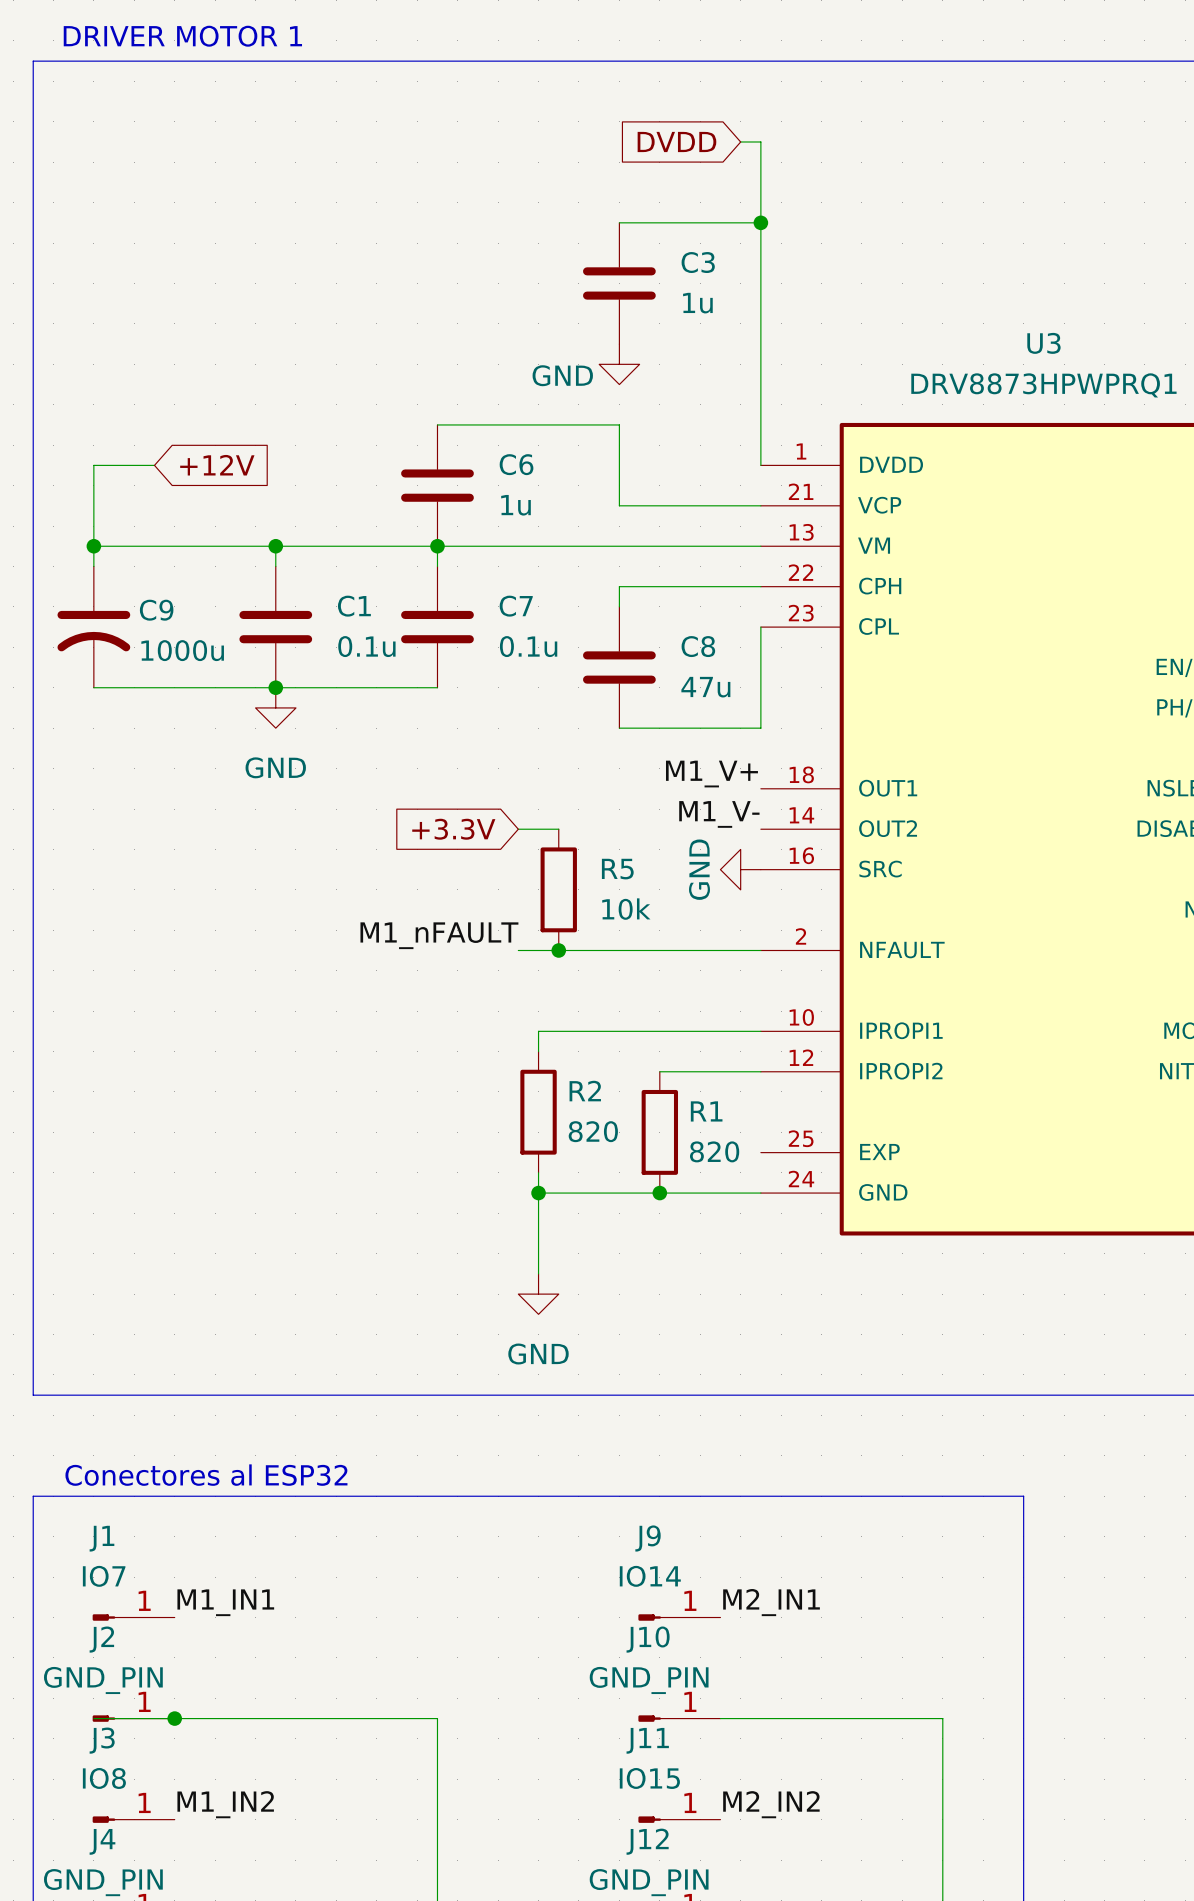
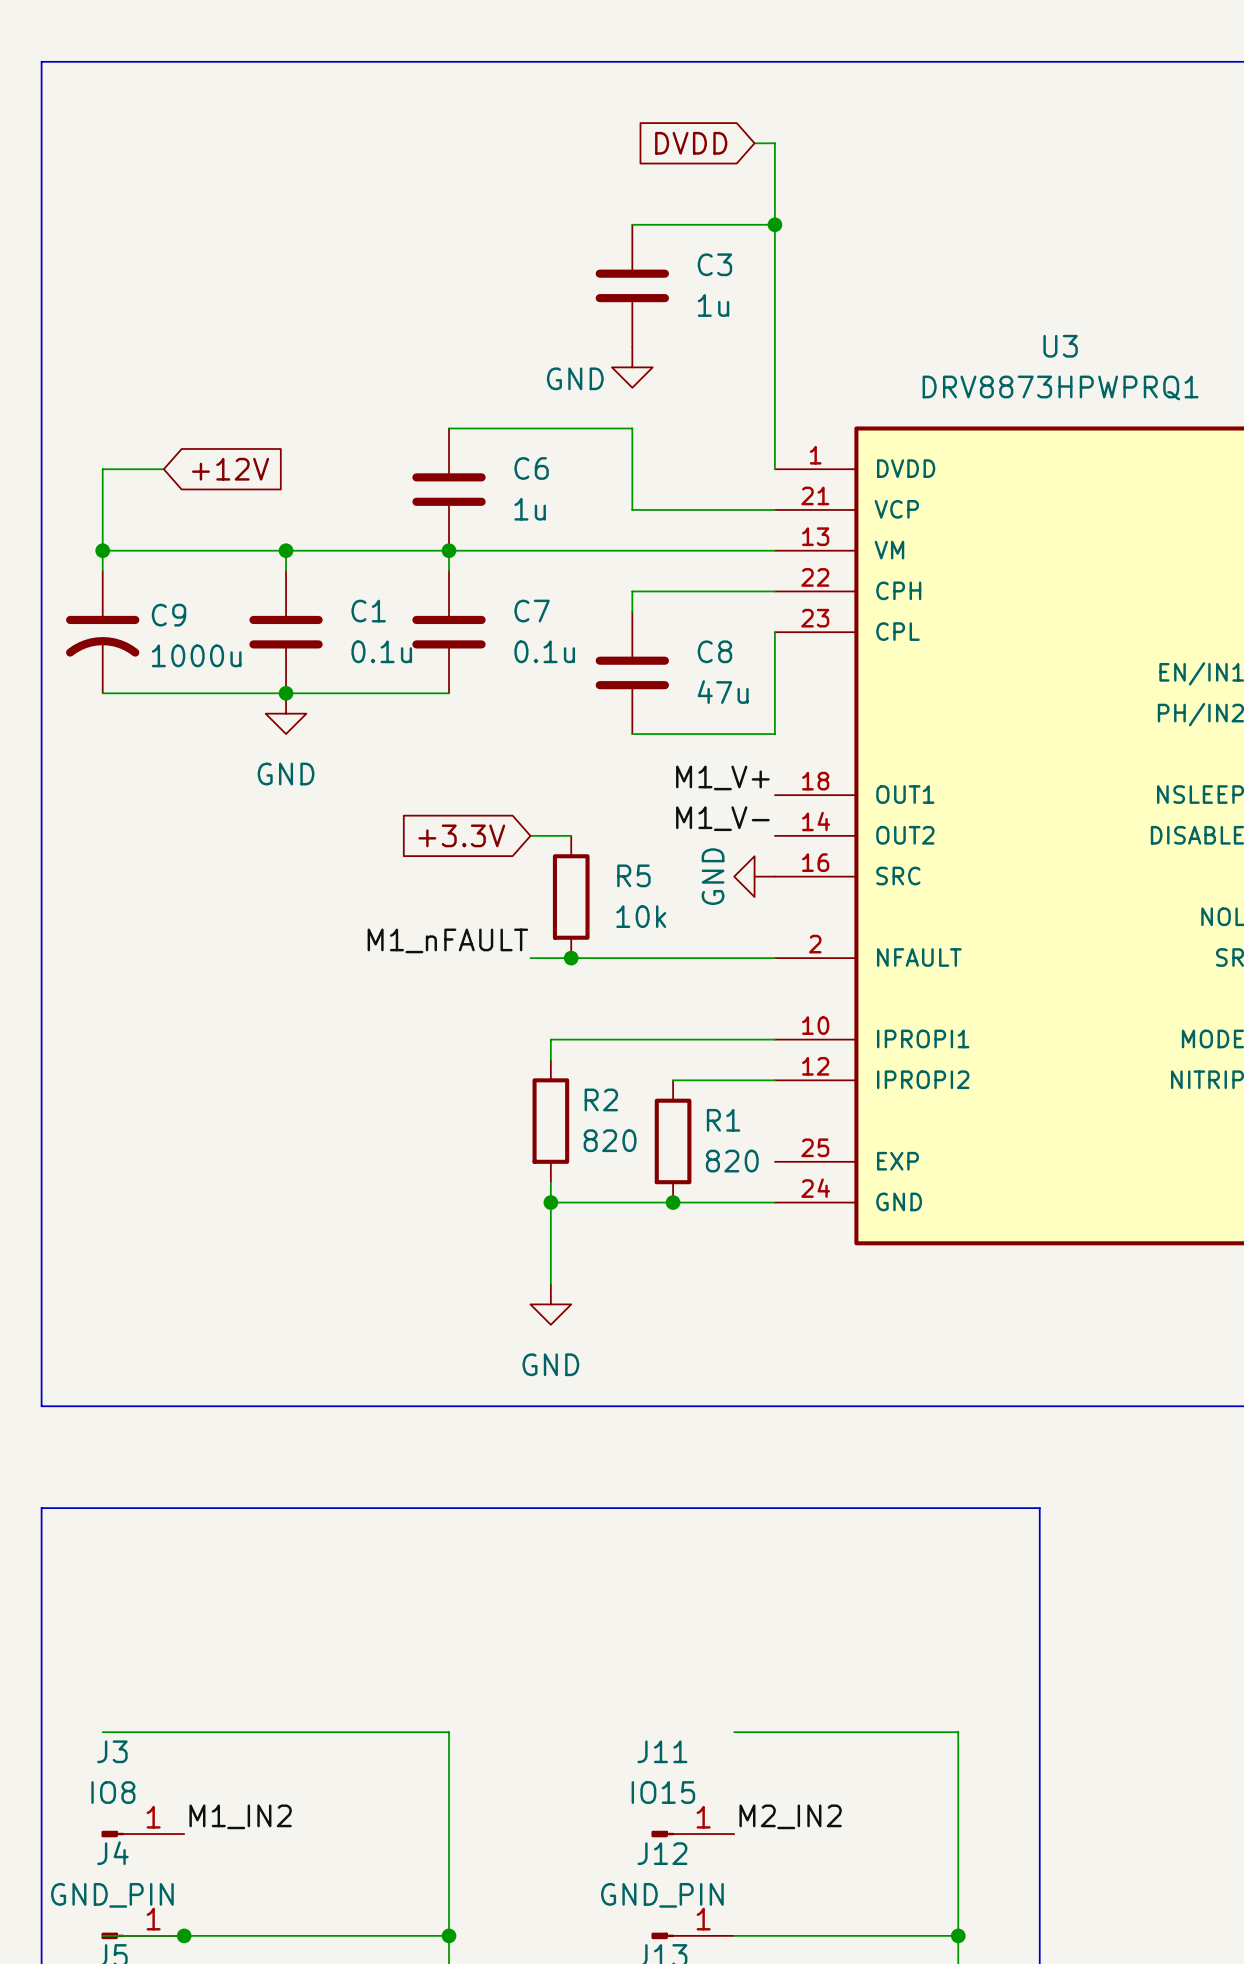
text: DRIVER MOTOR 1 (182, 36) -> none
text: Conectores al ESP32 (206, 1475) -> none
label: M1_IN1 (225, 1602) -> none
label: M2_IN1 (771, 1602) -> none
J1: IO7 (133, 1617) -> none
J9: IO14 (679, 1617) -> none
J2: GND_PIN (133, 1718) -> none
junction: (174, 1718) -> none
J10: GND_PIN (679, 1718) -> none

